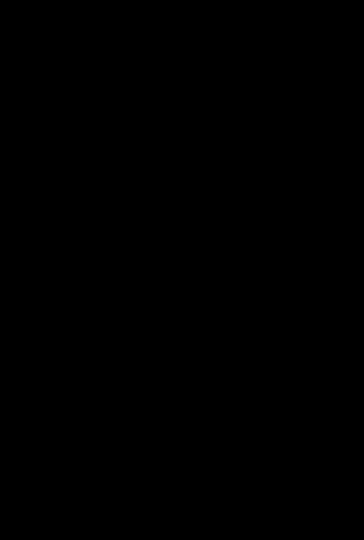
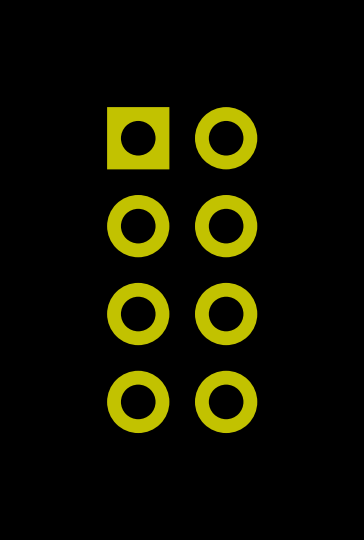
part: none -> (182, 270)

